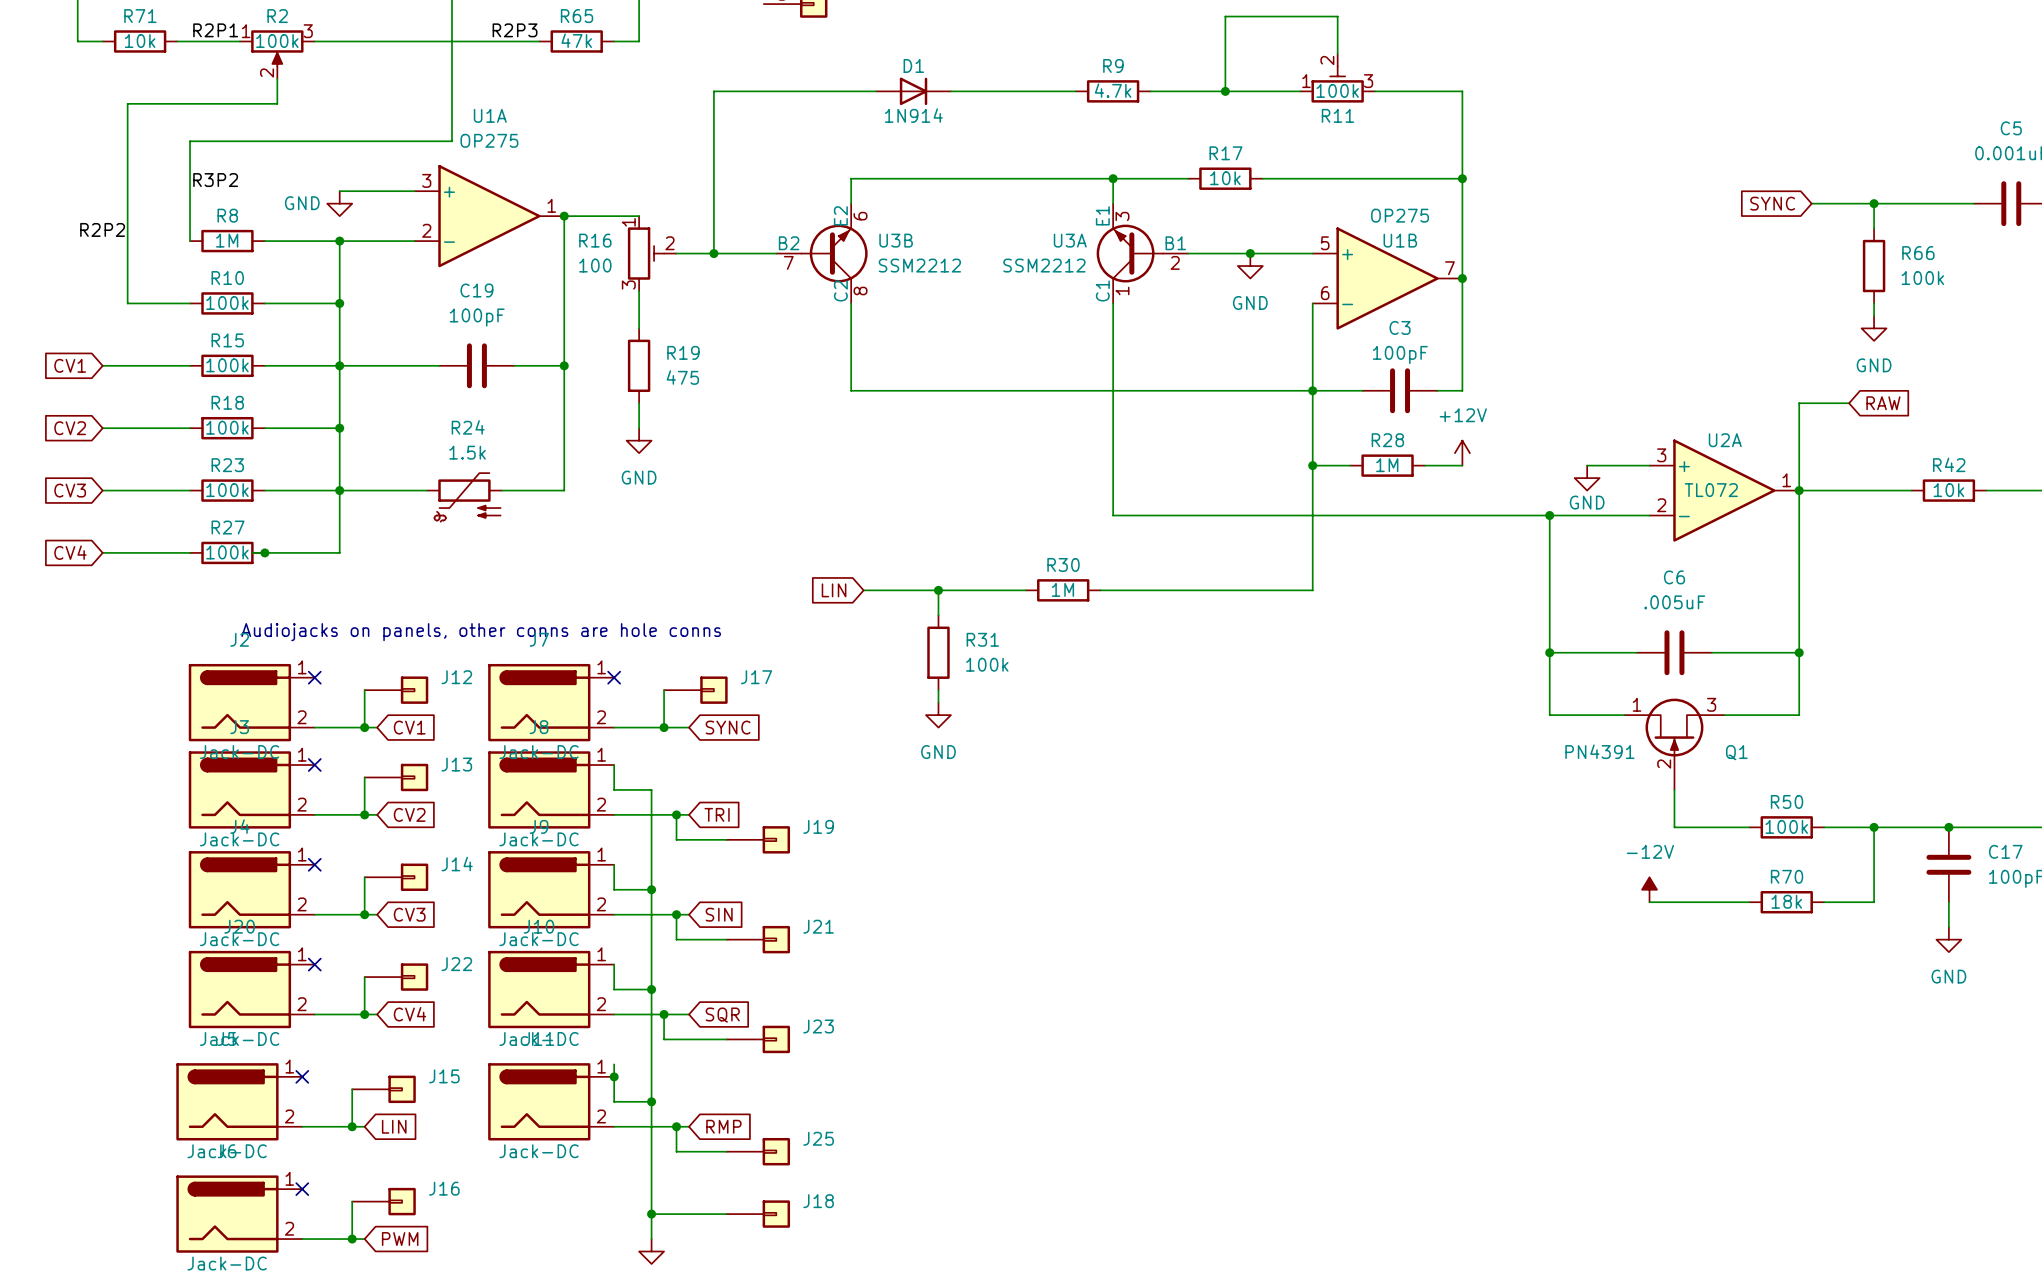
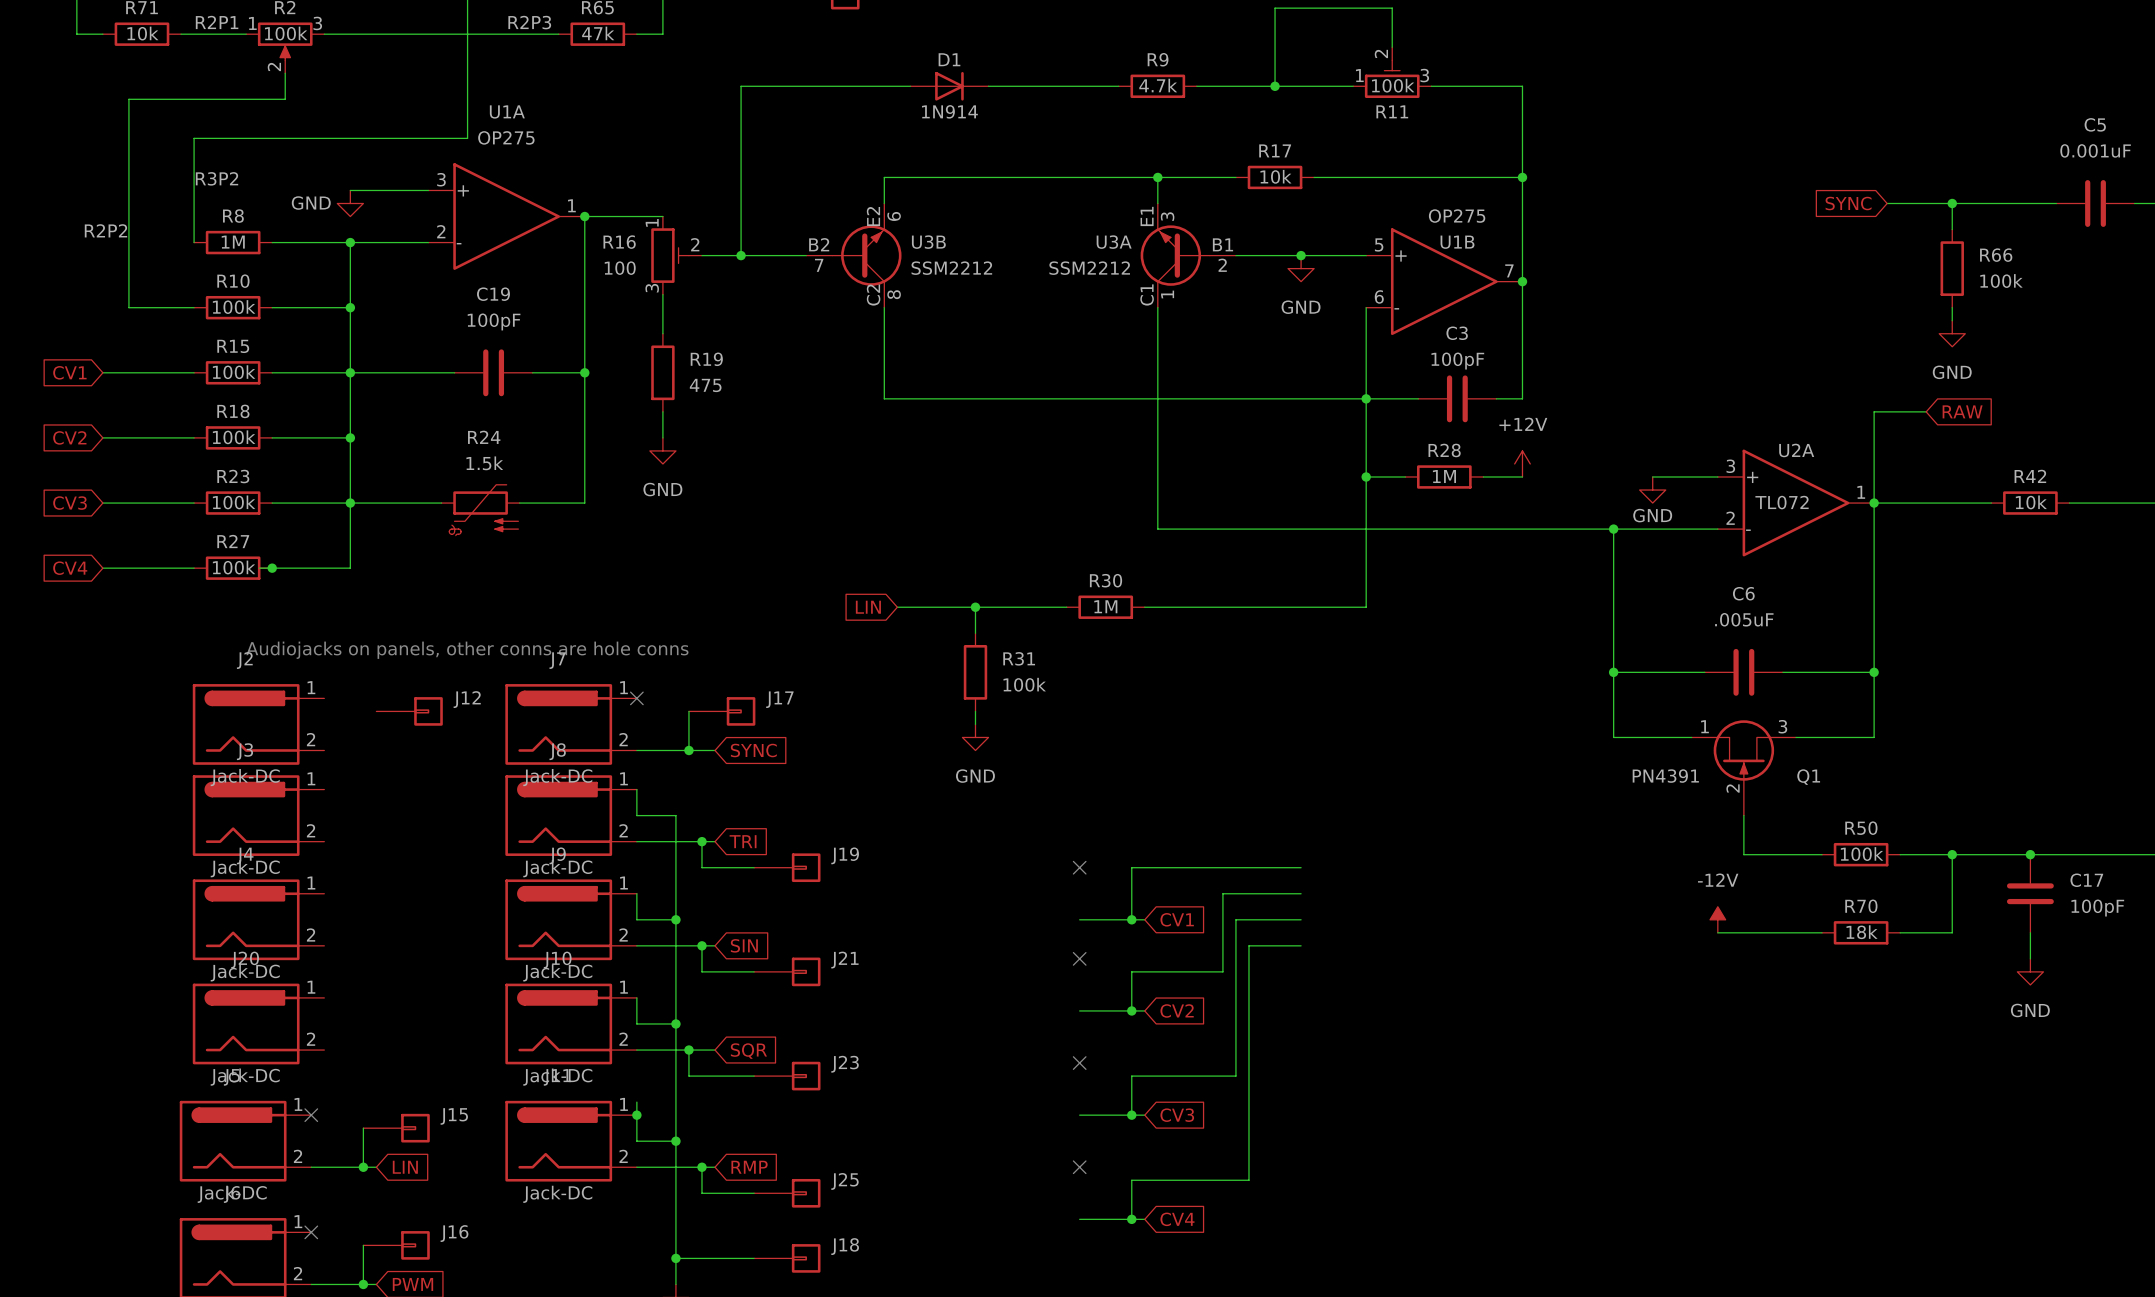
no-connect mark: (314, 677) -> none
wire: (364, 690) (364, 727) -> none
wire: (314, 727) (377, 727) -> none
junction: (364, 727) -> none
global label: CV1 (409, 727) -> none
no-connect mark: (314, 765) -> none
wire: (364, 777) (364, 814) -> none
J13: (396, 777) -> none
wire: (314, 814) (377, 814) -> none
junction: (364, 814) -> none
global label: CV2 (409, 814) -> none
no-connect mark: none -> (1079, 867)
wire: none -> (1301, 867) (1131, 867) (1131, 919)
no-connect mark: (314, 864) -> none
wire: none -> (1301, 893) (1222, 893) (1222, 971) (1131, 971) (1131, 1010)
wire: (364, 877) (364, 914) -> none
J14: (396, 877) -> none
wire: none -> (1079, 919) (1144, 919)
junction: none -> (1131, 919)
global label: none -> CV1 (1177, 919)
wire: none -> (1301, 919) (1235, 919) (1235, 1076) (1131, 1076) (1131, 1115)
wire: (314, 914) (377, 914) -> none
junction: (364, 914) -> none
global label: CV3 (409, 914) -> none
wire: none -> (1301, 945) (1248, 945) (1248, 1180) (1131, 1180) (1131, 1219)
no-connect mark: none -> (1079, 958)
no-connect mark: (314, 964) -> none
wire: (364, 977) (364, 1014) -> none
J22: (396, 977) -> none
wire: none -> (1079, 1010) (1144, 1010)
junction: none -> (1131, 1010)
global label: none -> CV2 (1177, 1010)
wire: (314, 1014) (377, 1014) -> none
junction: (364, 1014) -> none
global label: CV4 (409, 1014) -> none
no-connect mark: none -> (1079, 1063)
wire: none -> (1079, 1115) (1144, 1115)
junction: none -> (1131, 1115)
global label: none -> CV3 (1177, 1115)
no-connect mark: none -> (1079, 1167)
wire: none -> (1079, 1219) (1144, 1219)
junction: none -> (1131, 1219)
global label: none -> CV4 (1177, 1219)

